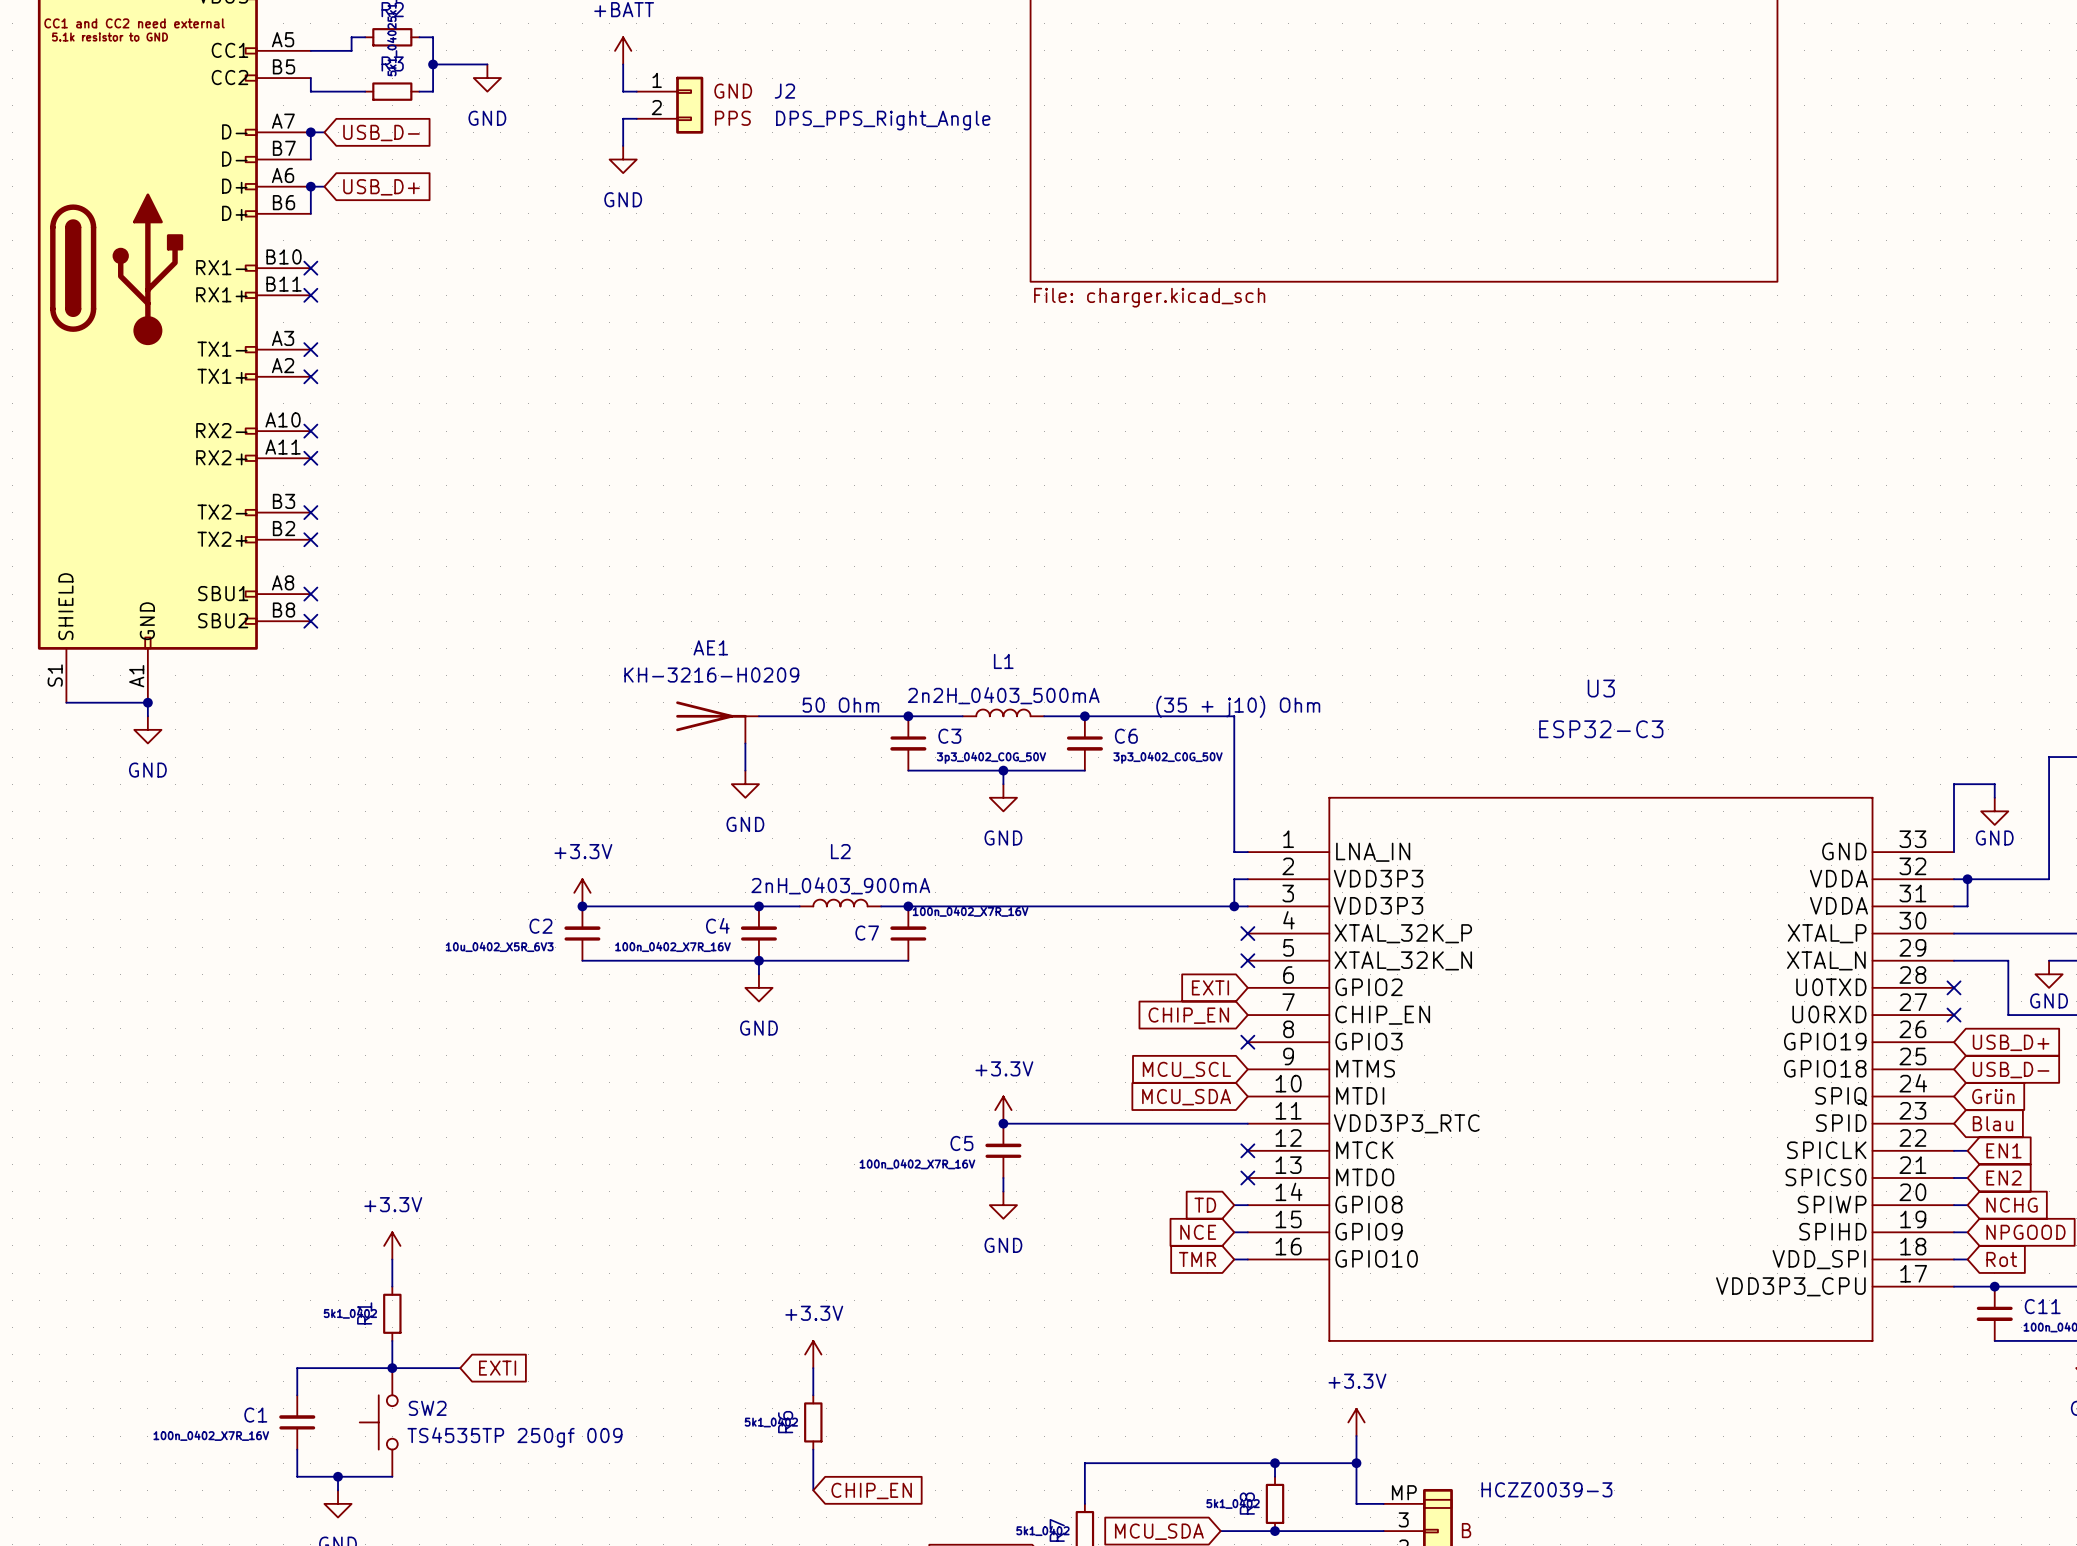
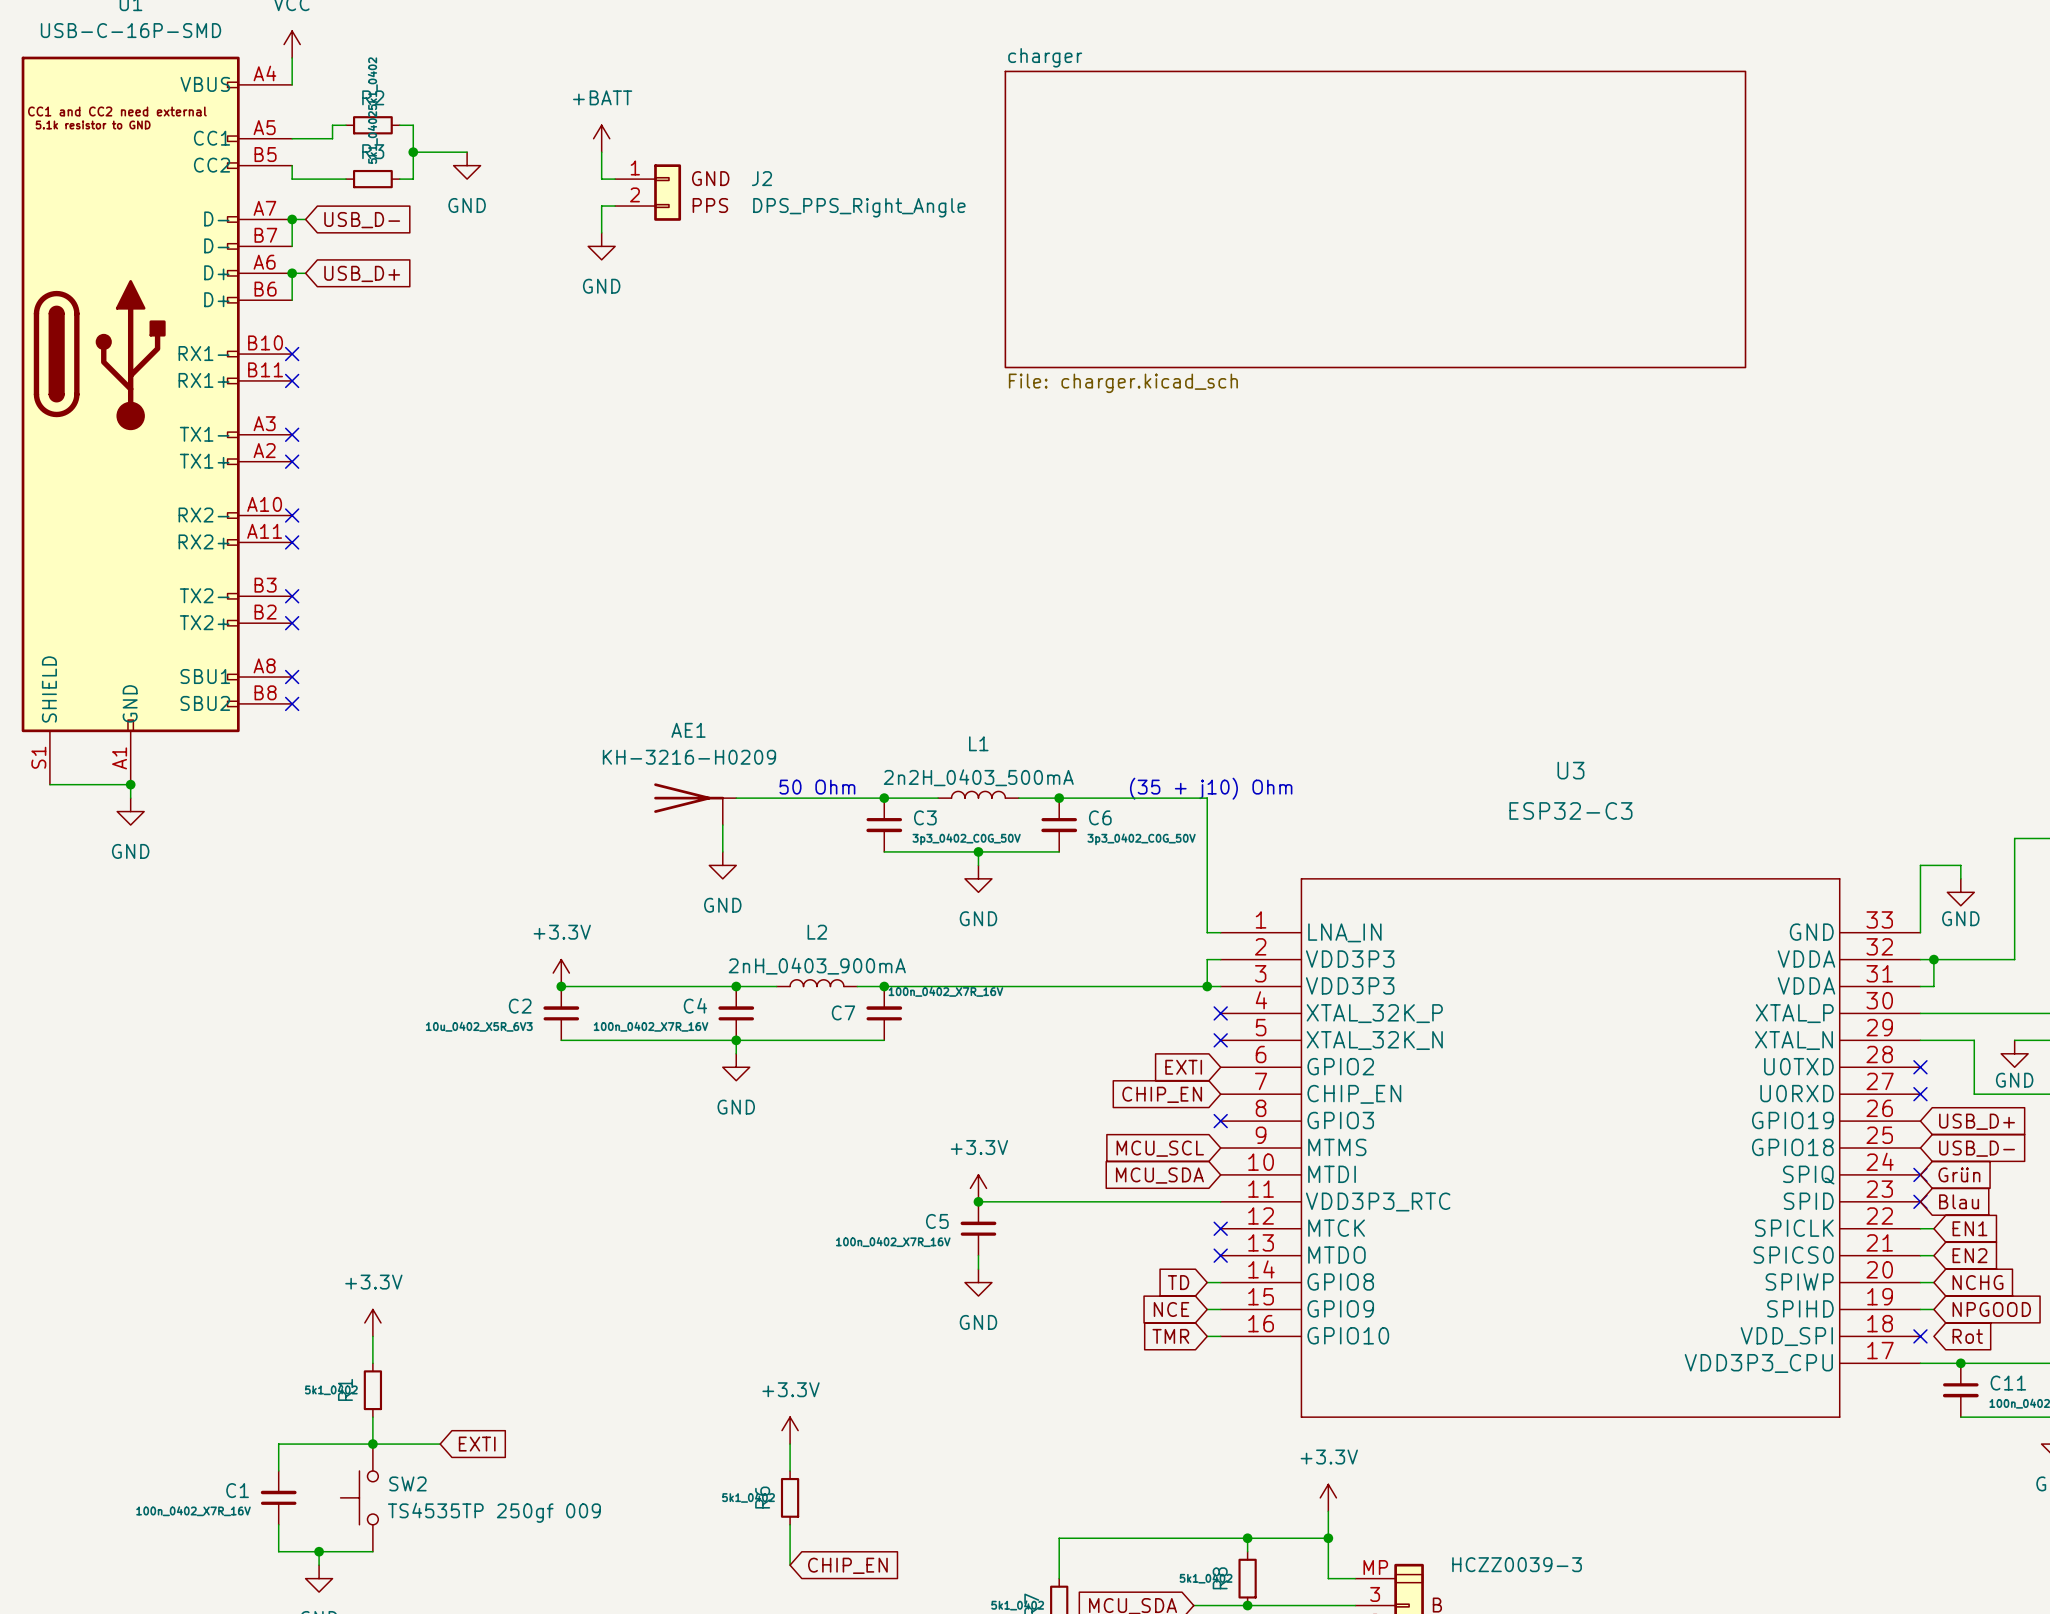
no-connect mark: none -> (1920, 1174)
no-connect mark: none -> (1920, 1201)
wire: (1954, 1259) (1967, 1259) -> none
no-connect mark: none -> (1920, 1336)

